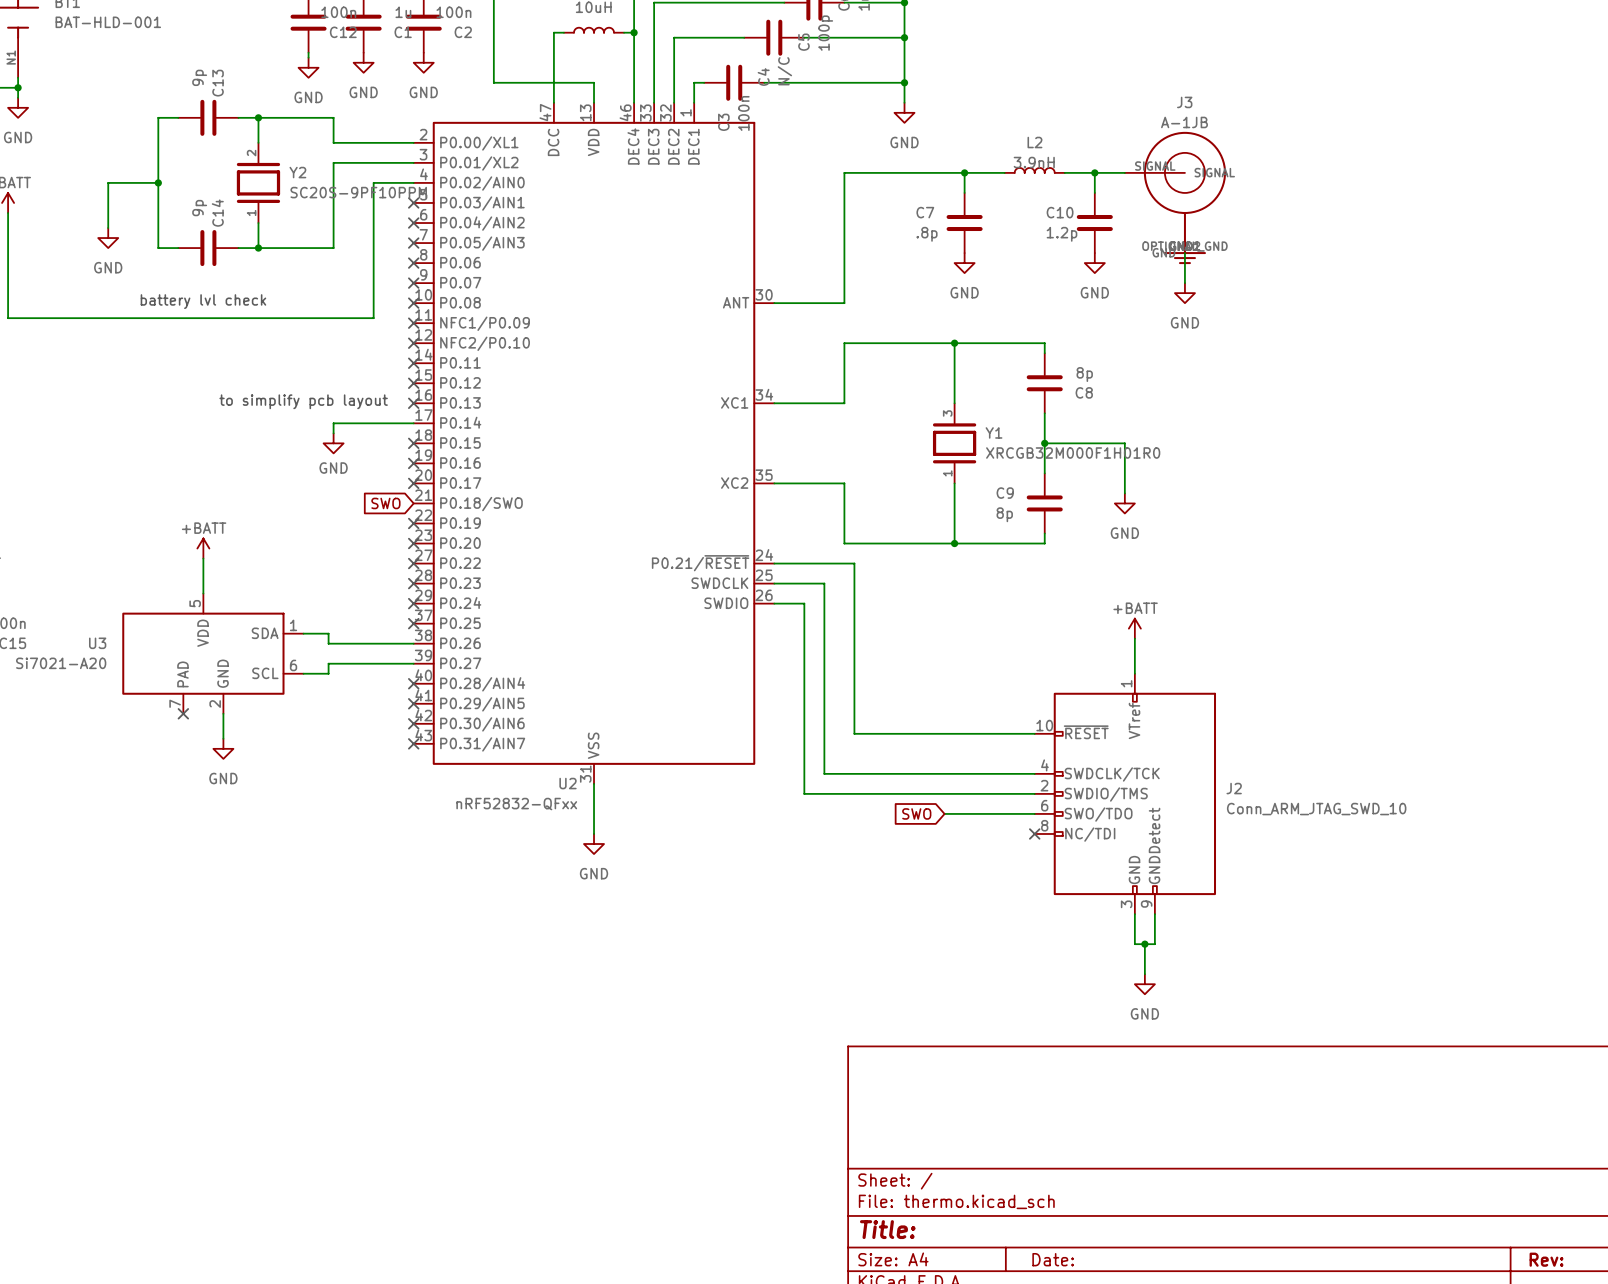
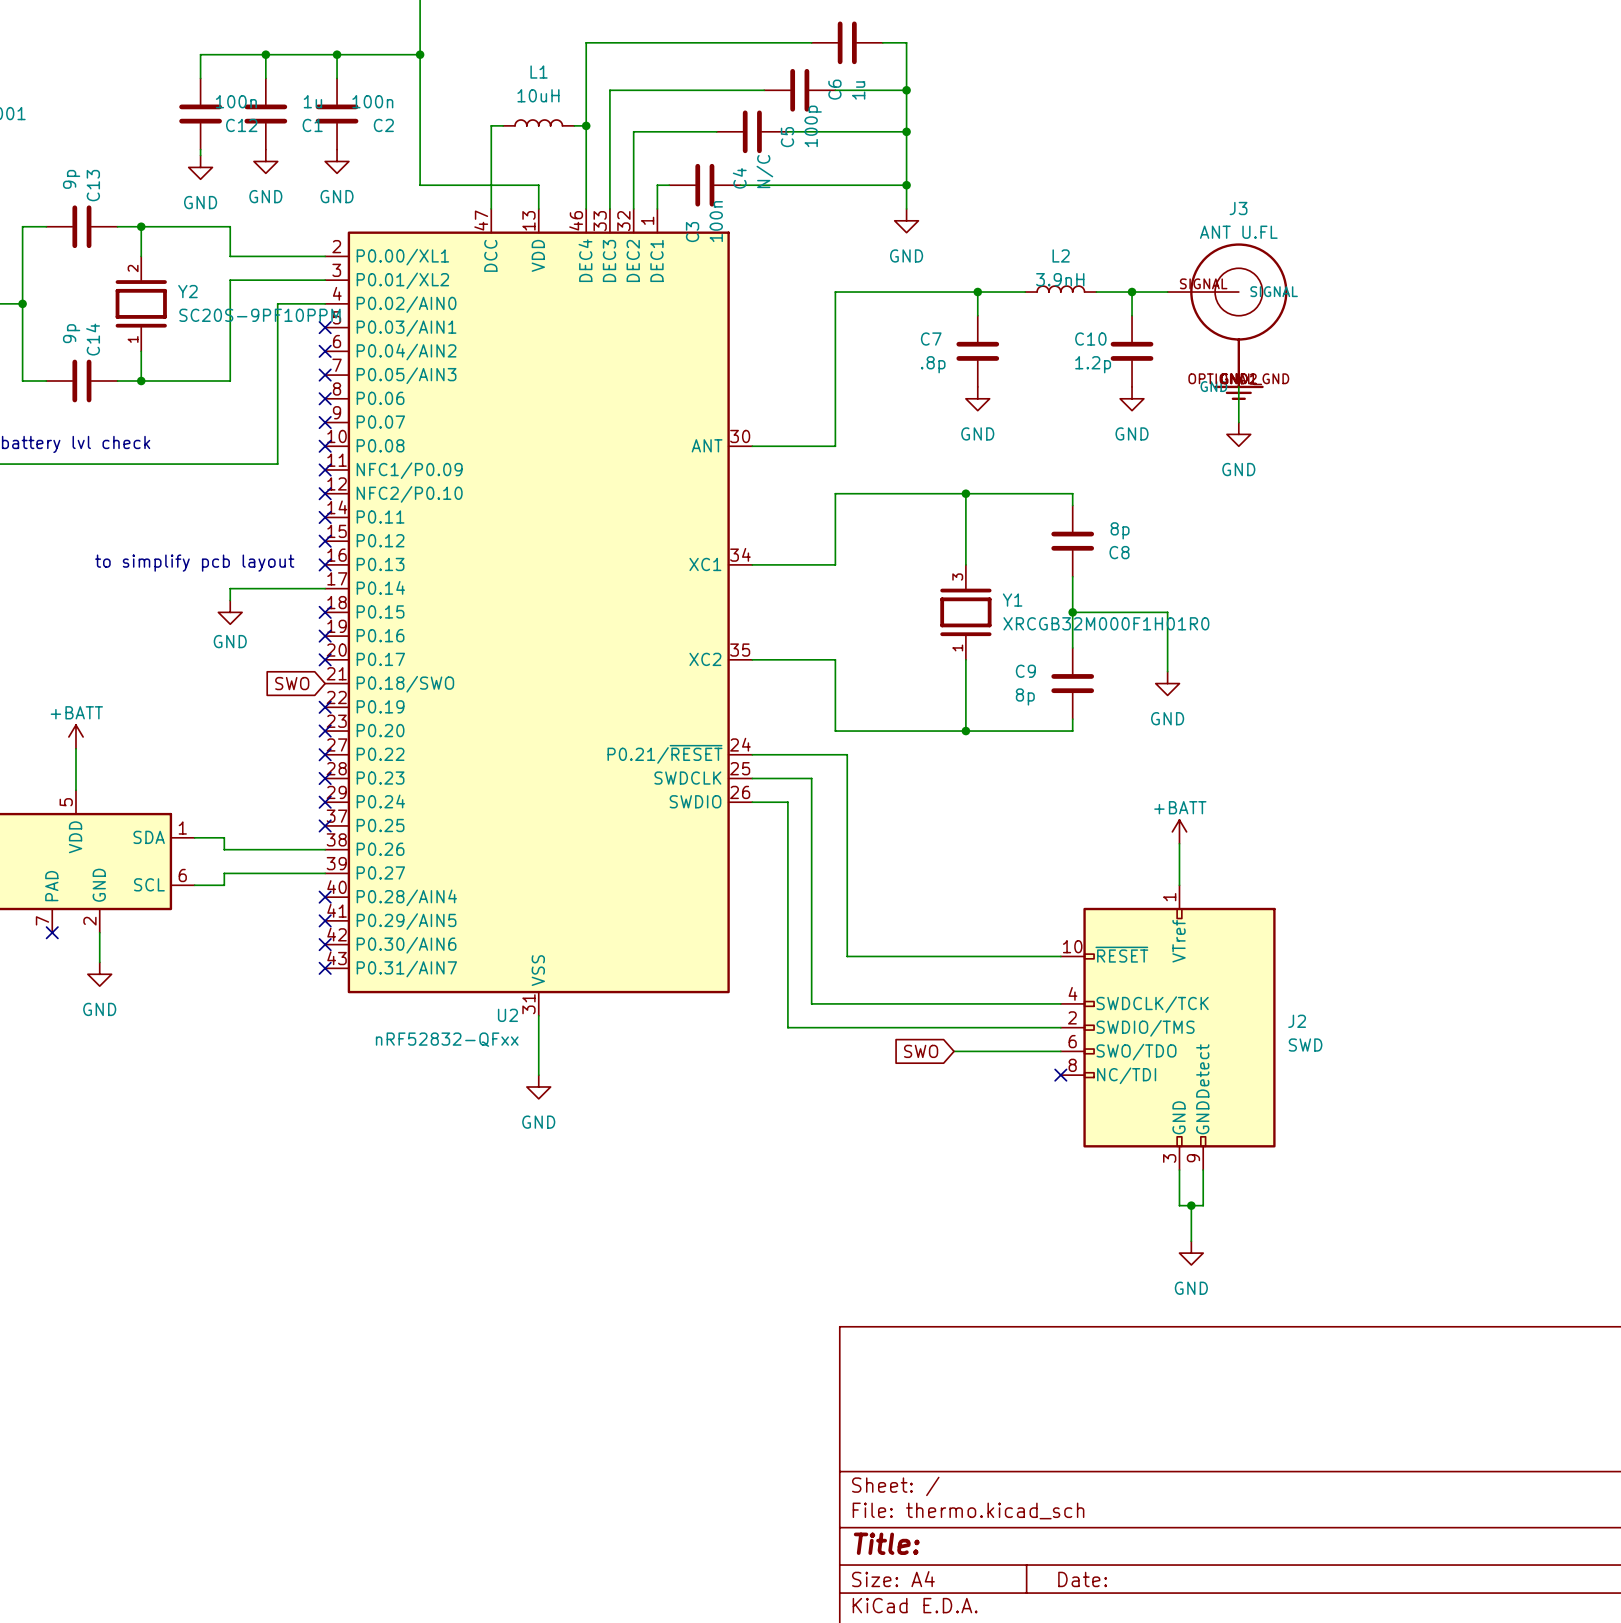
J3 value: A-1JB (1184, 122) -> ANT U.FL (1238, 232)
J2 value: Conn_ARM_JTAG_SWD_10 (1316, 809) -> SWD (1305, 1045)

